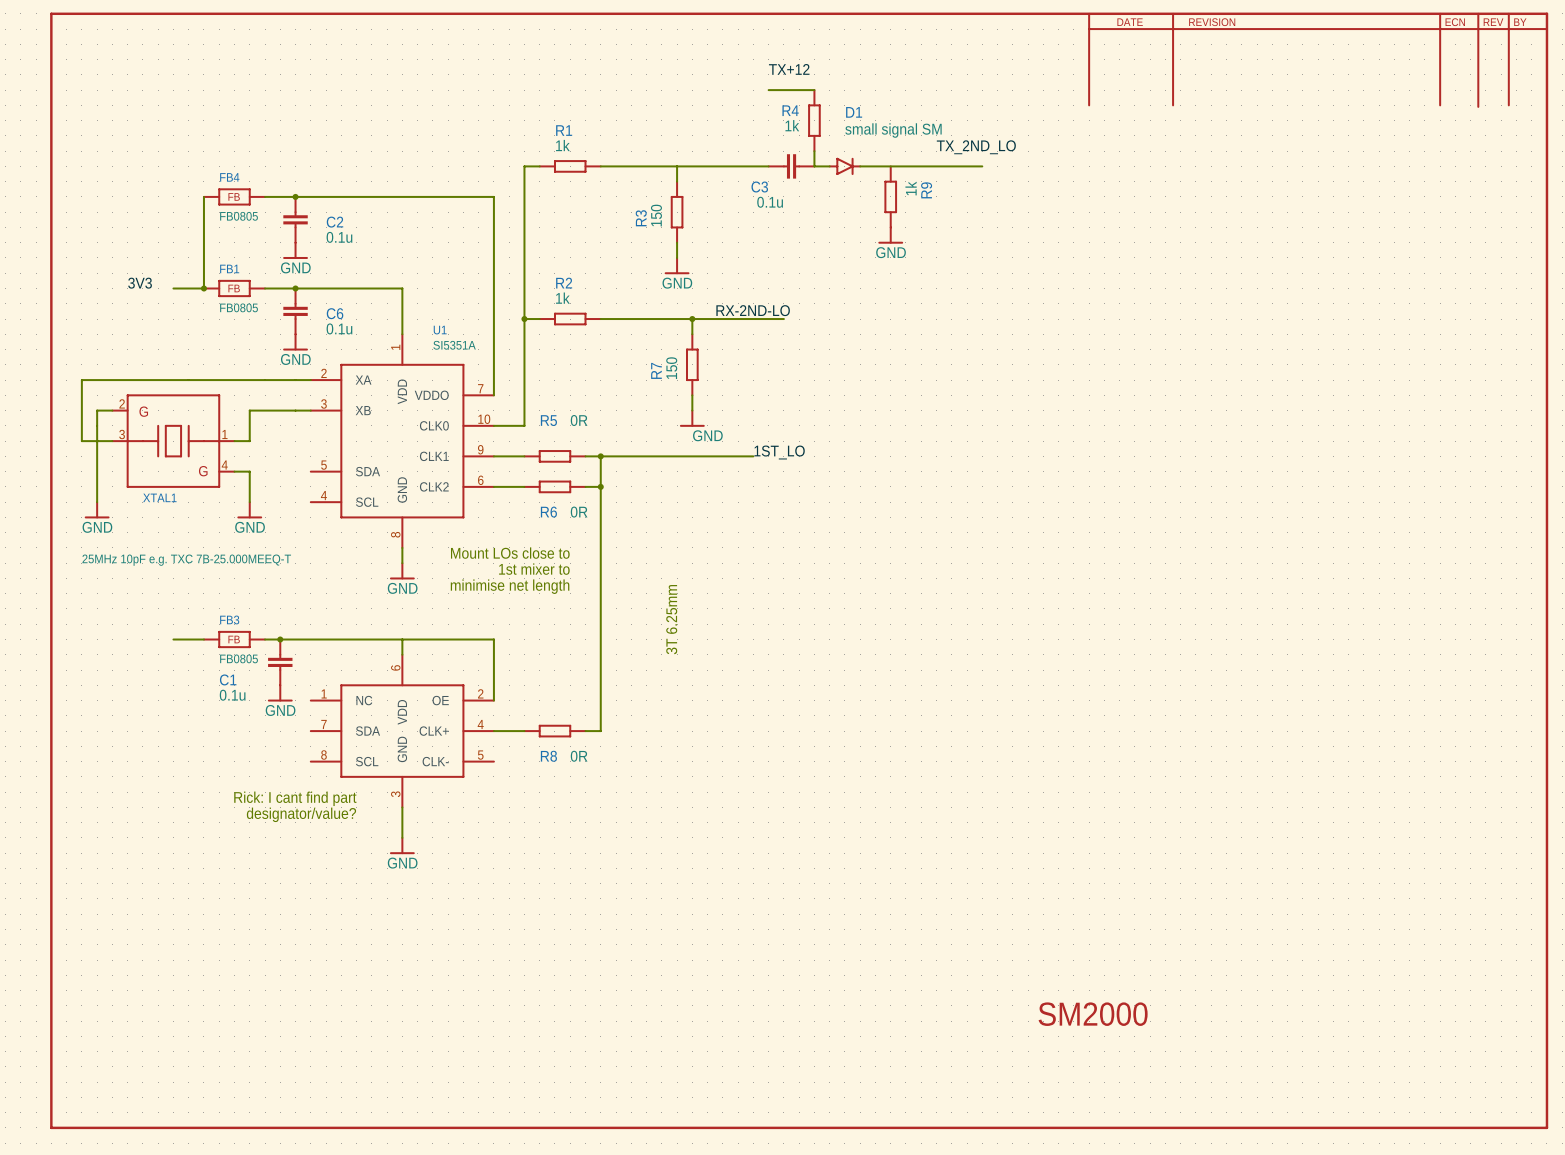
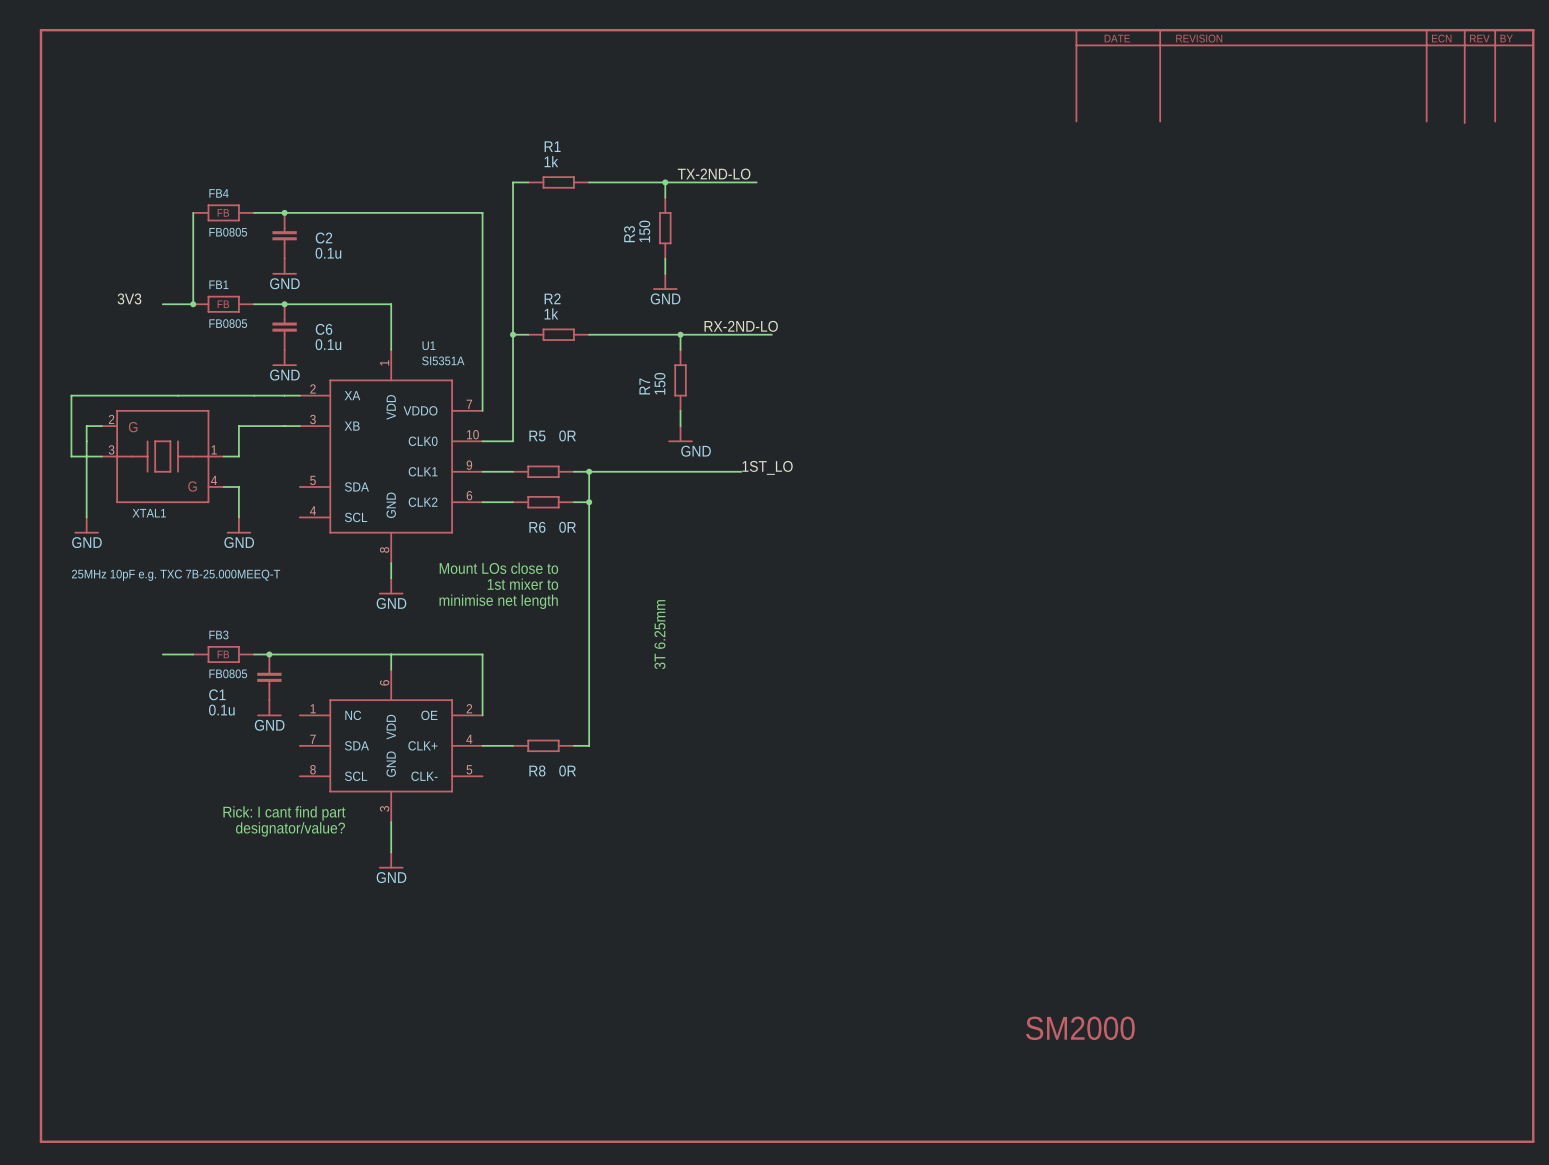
label: TX+12 (789, 69) -> none
wire: (768, 90) (814, 90) -> none
R4: 1k (814, 120) -> none
label: TX_2ND_LO (976, 147) -> none
wire: (814, 151) (814, 166) (829, 166) -> none
label: none -> TX-2ND-LO (714, 174)
junction: none -> (665, 182)
C3: 0.1u (791, 166) -> none
D1: small signal SM (844, 166) -> none
wire: (860, 166) (982, 166) -> none
R9: 1k (890, 196) -> none
power symbol: GND (890, 235) -> none

